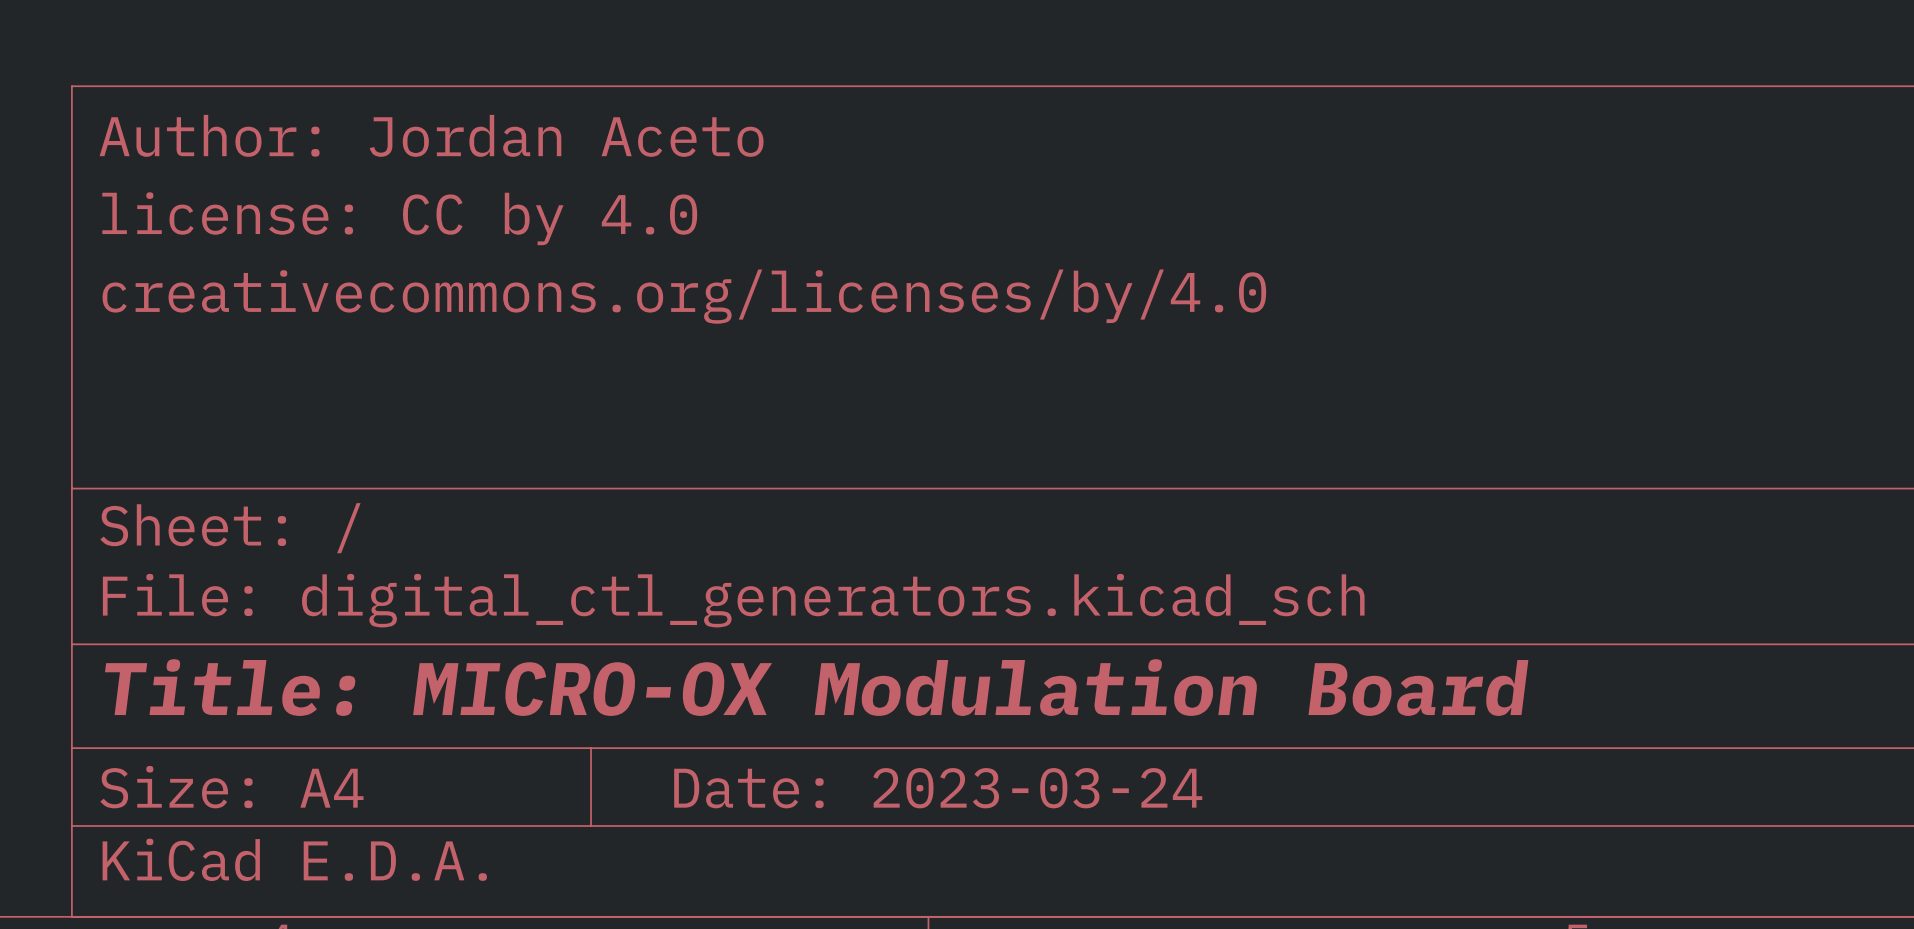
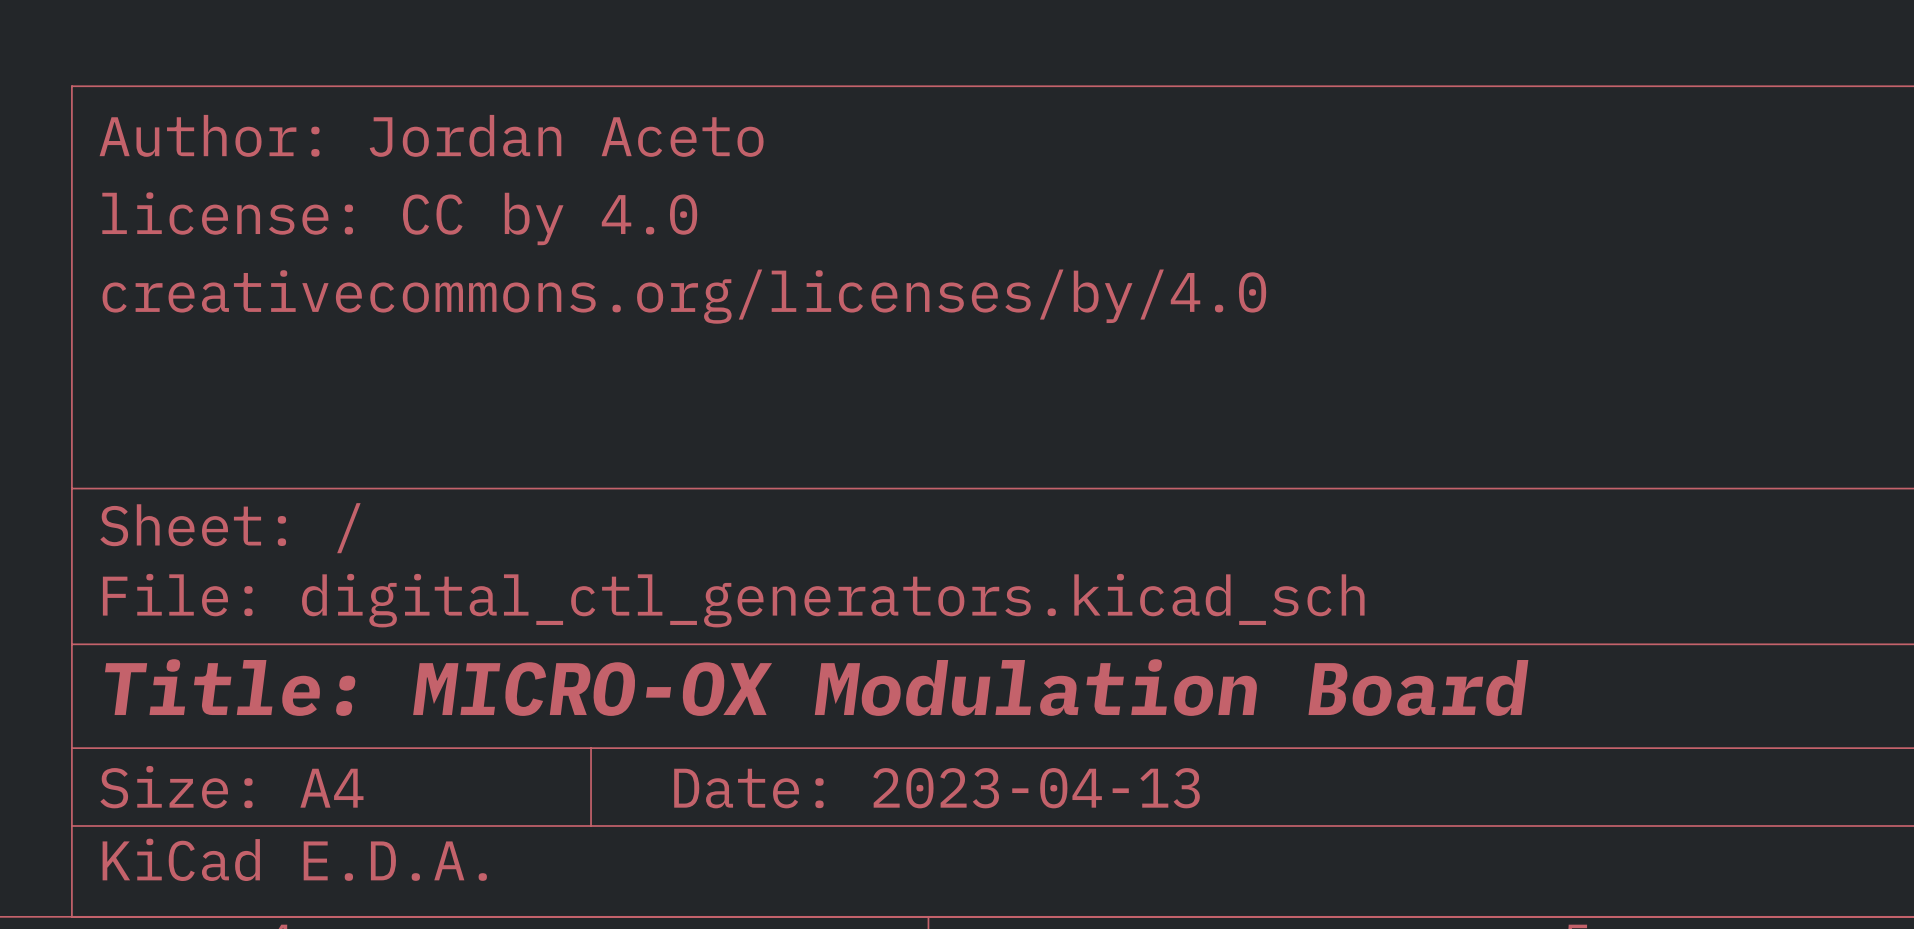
title block: Date: 2023-03-24 (938, 788) -> Date: 2023-04-13 (937, 788)

